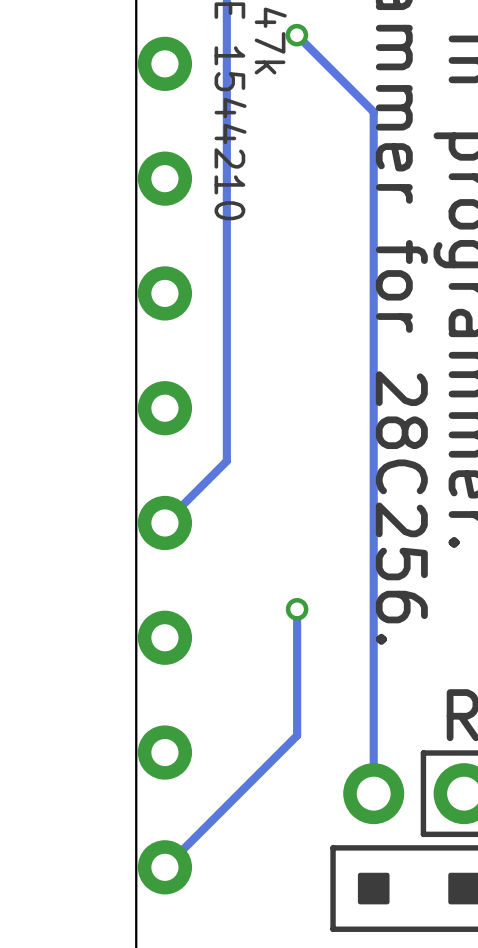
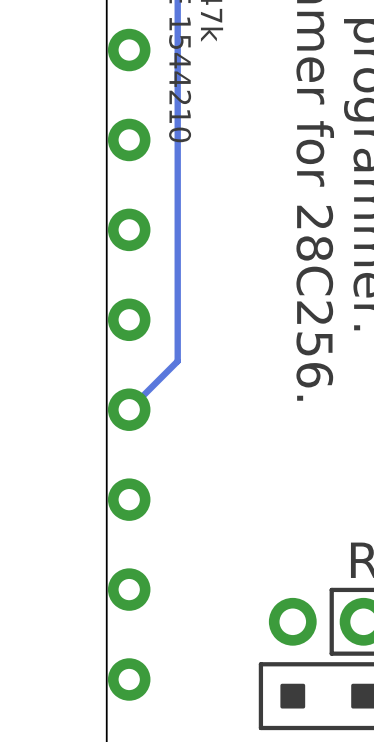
track: (296, 35) (373, 111) (373, 793) -> none
via: (296, 35) -> none
track: (297, 609) (297, 735) (165, 867) -> none
via: (297, 609) -> none

